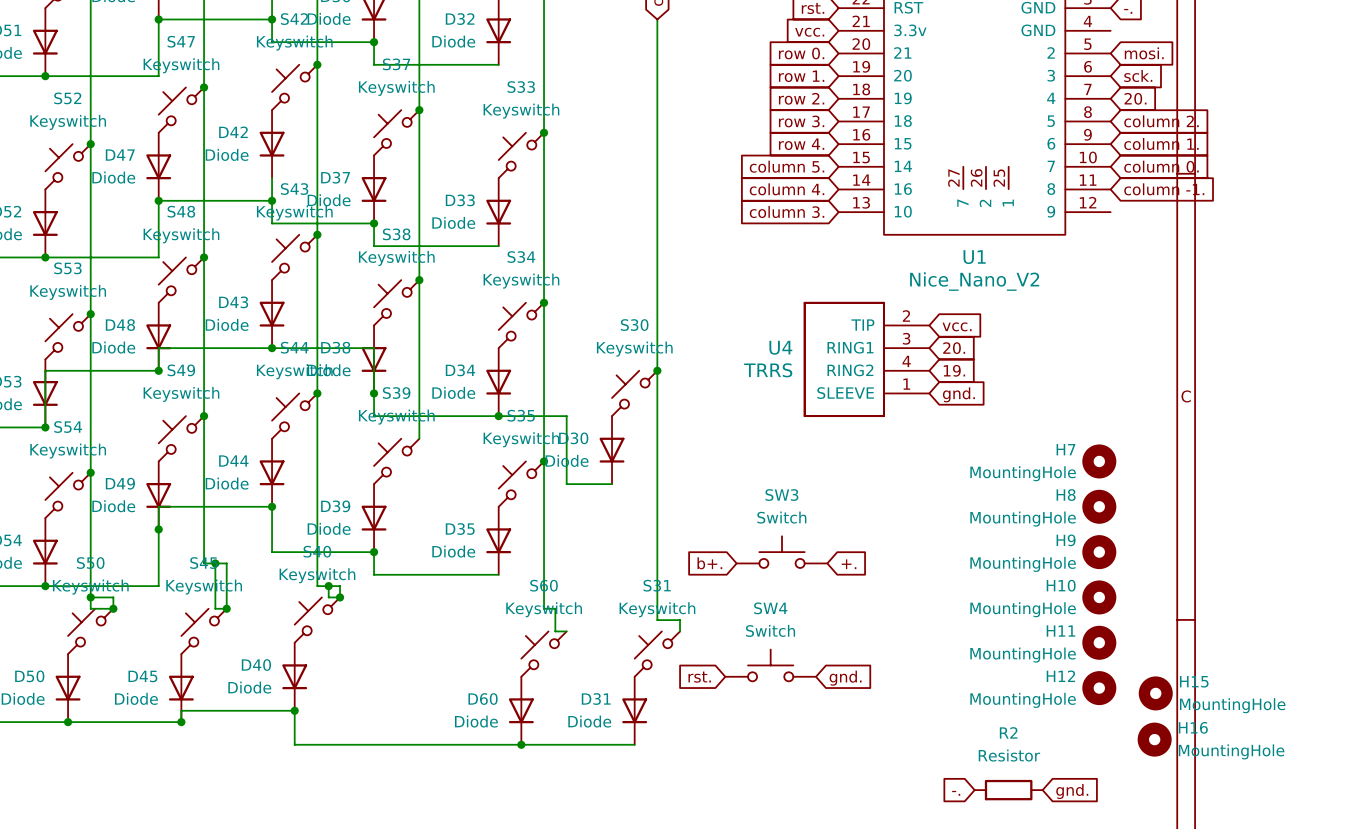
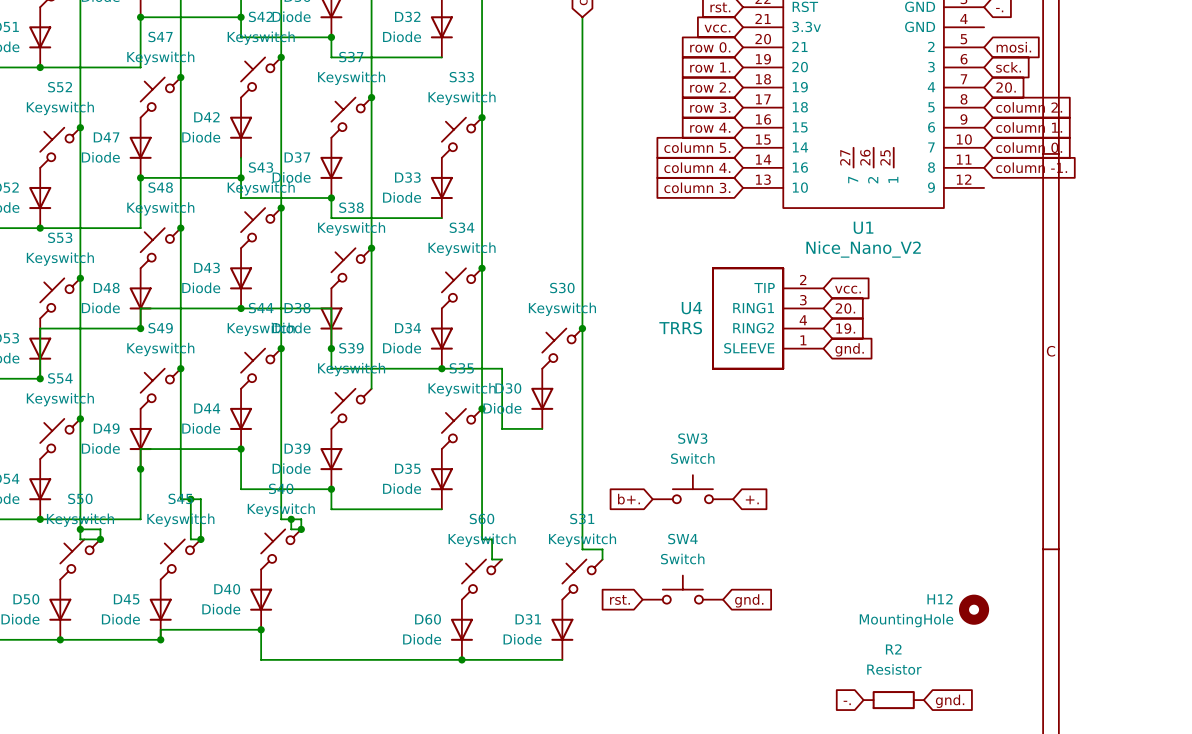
H7: MountingHole (1099, 461) -> none
H8: MountingHole (1099, 506) -> none
H9: MountingHole (1099, 552) -> none
H10: MountingHole (1099, 597) -> none
H11: MountingHole (1099, 642) -> none
H15: MountingHole (1155, 693) -> none
H16: MountingHole (1154, 739) -> none

